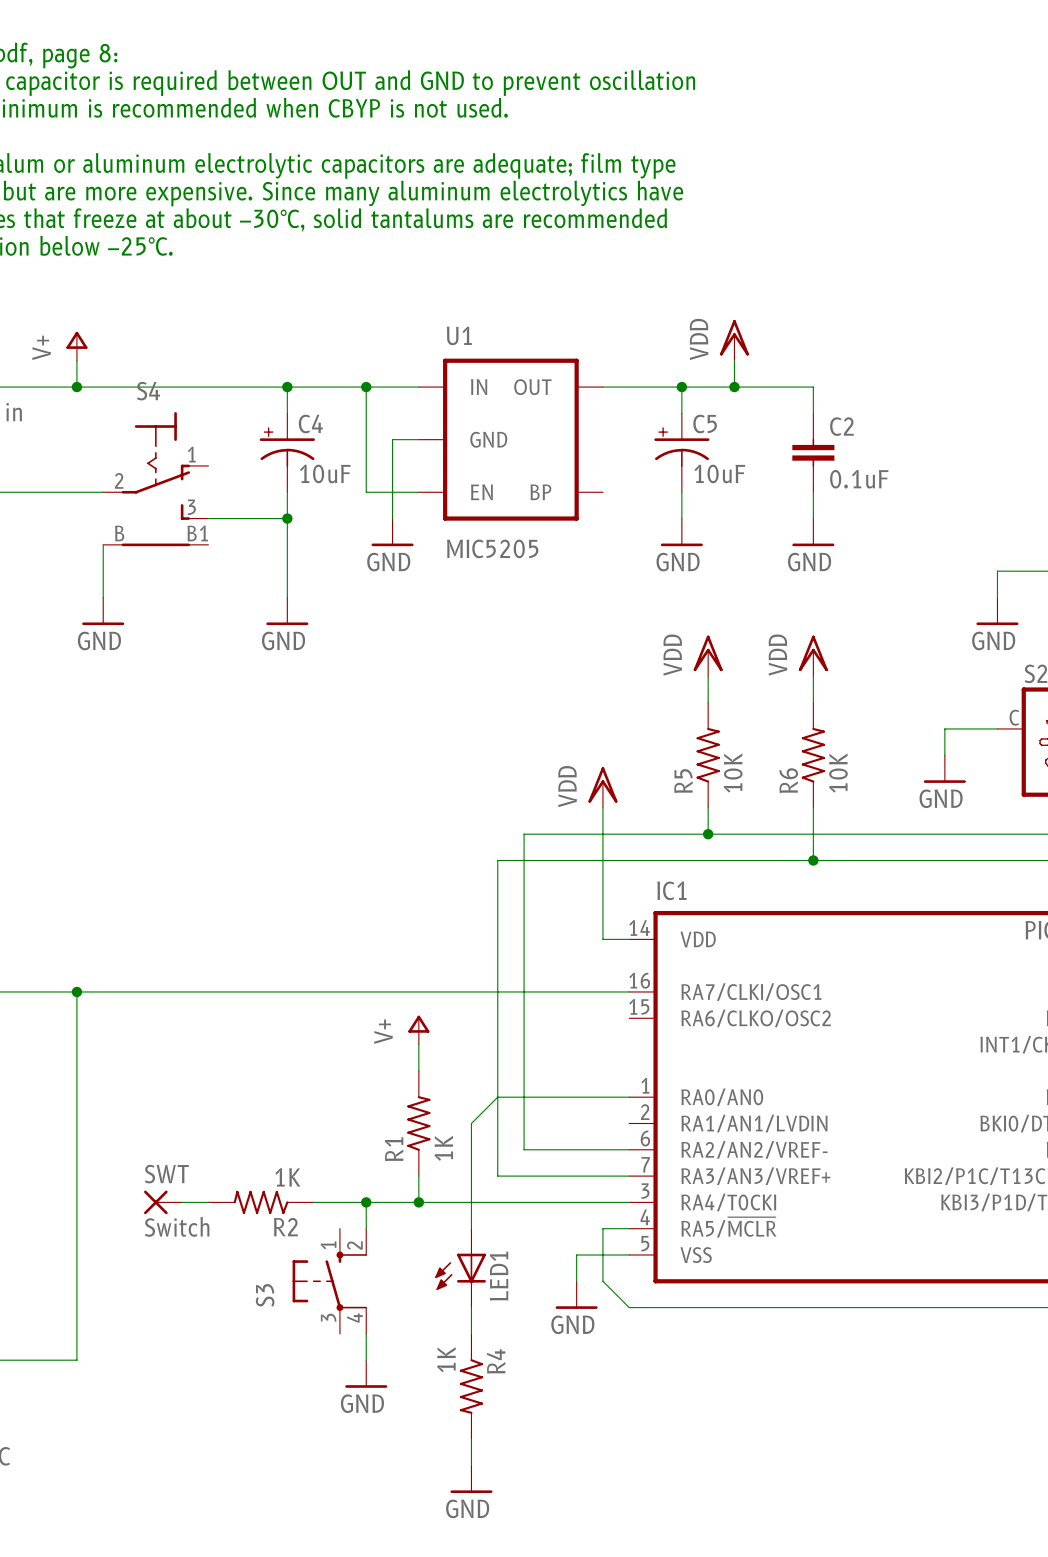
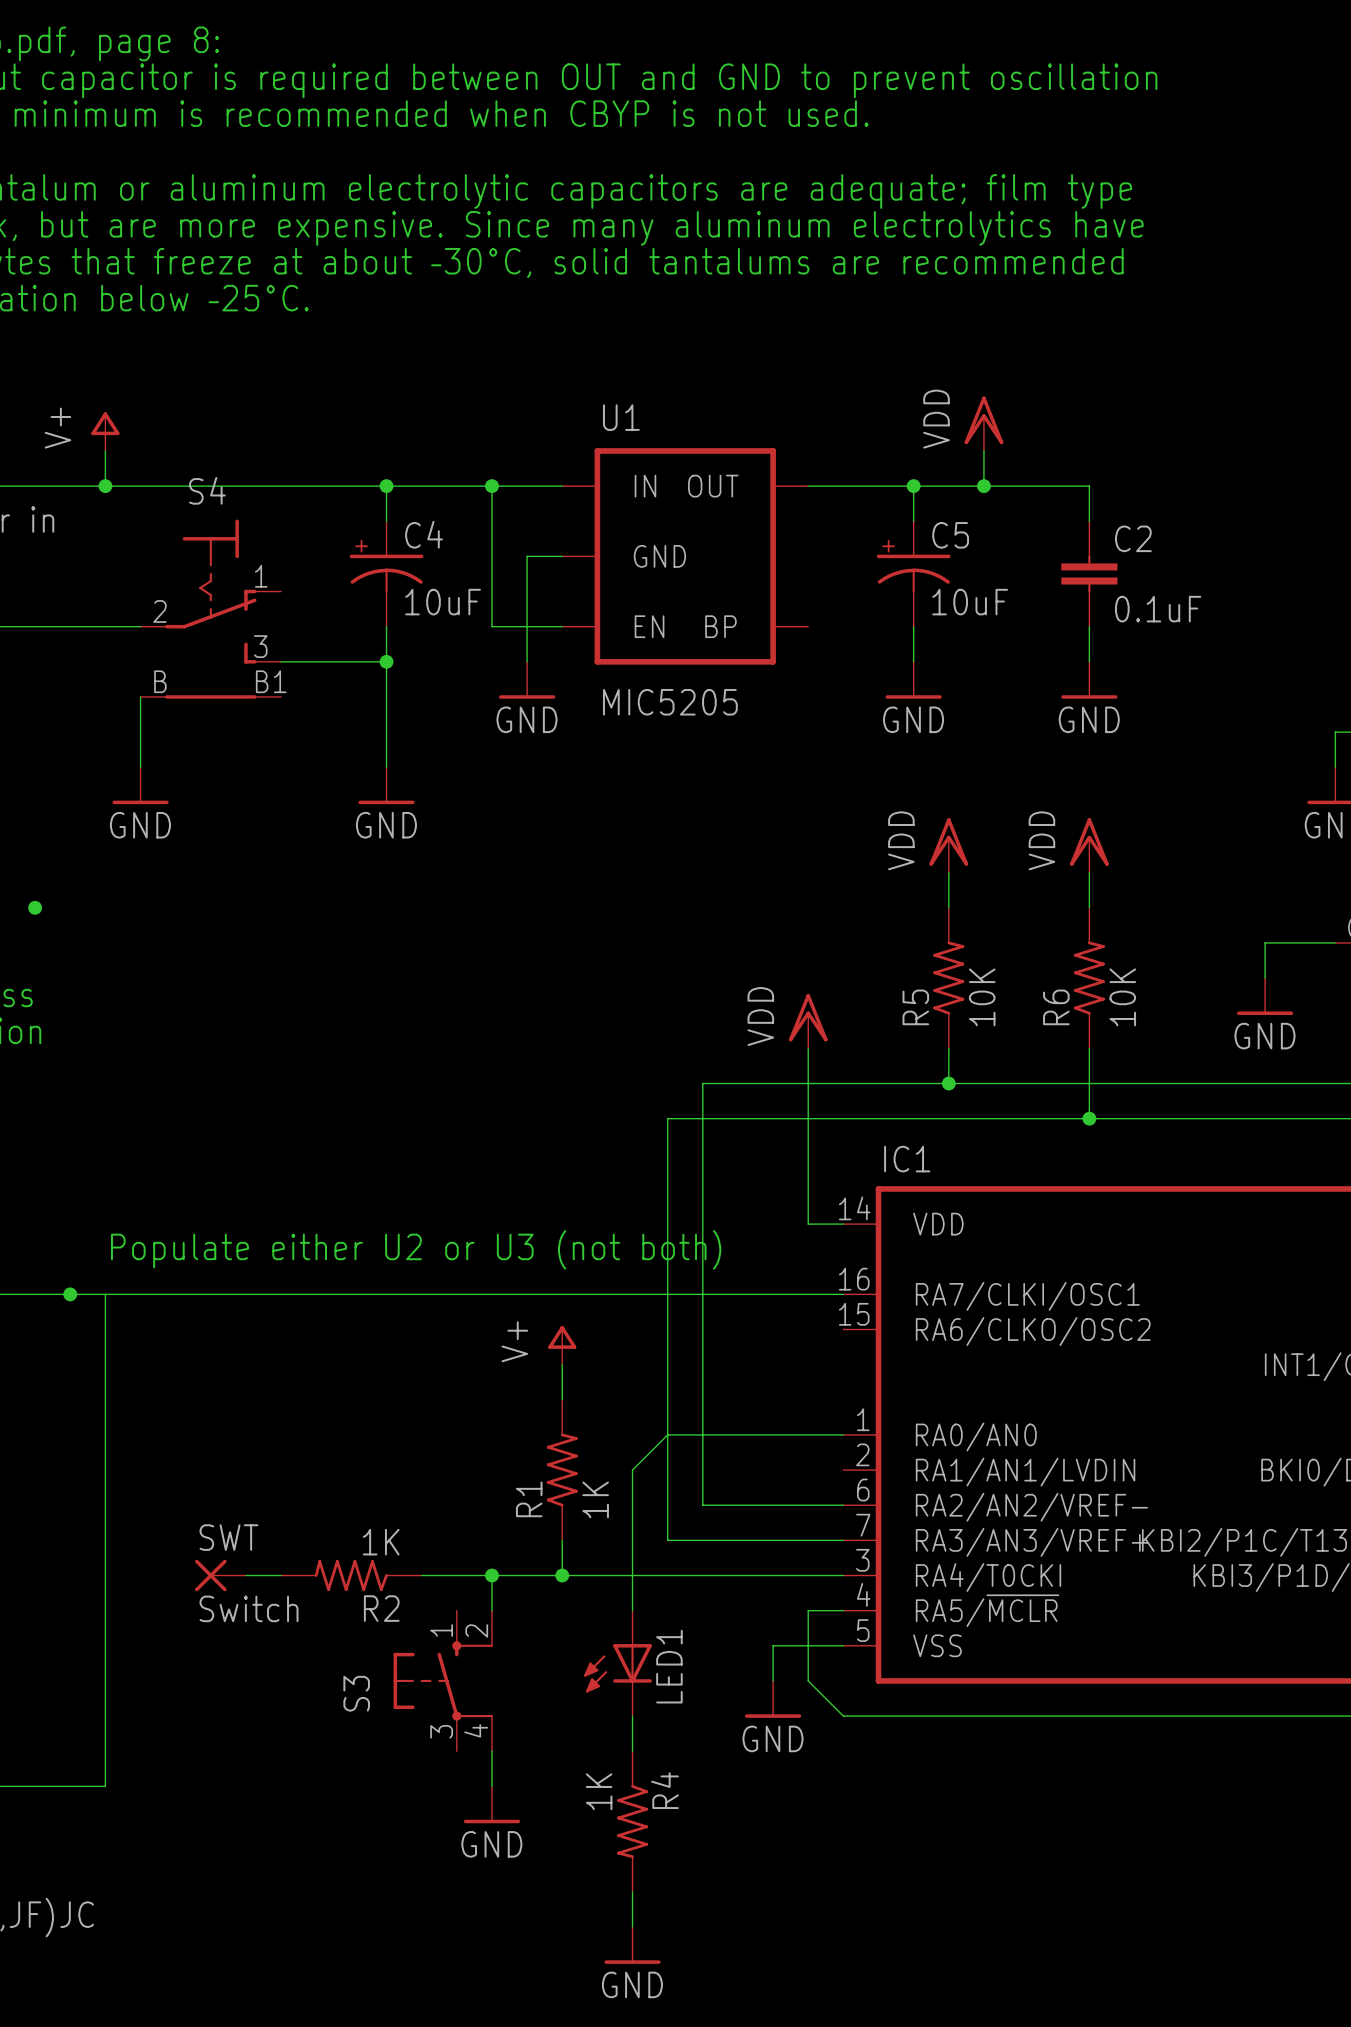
junction: none -> (35, 907)
text: none -> Populate either U2 or U3 (not both) (416, 1249)
junction position: (76, 991) -> (70, 1294)

